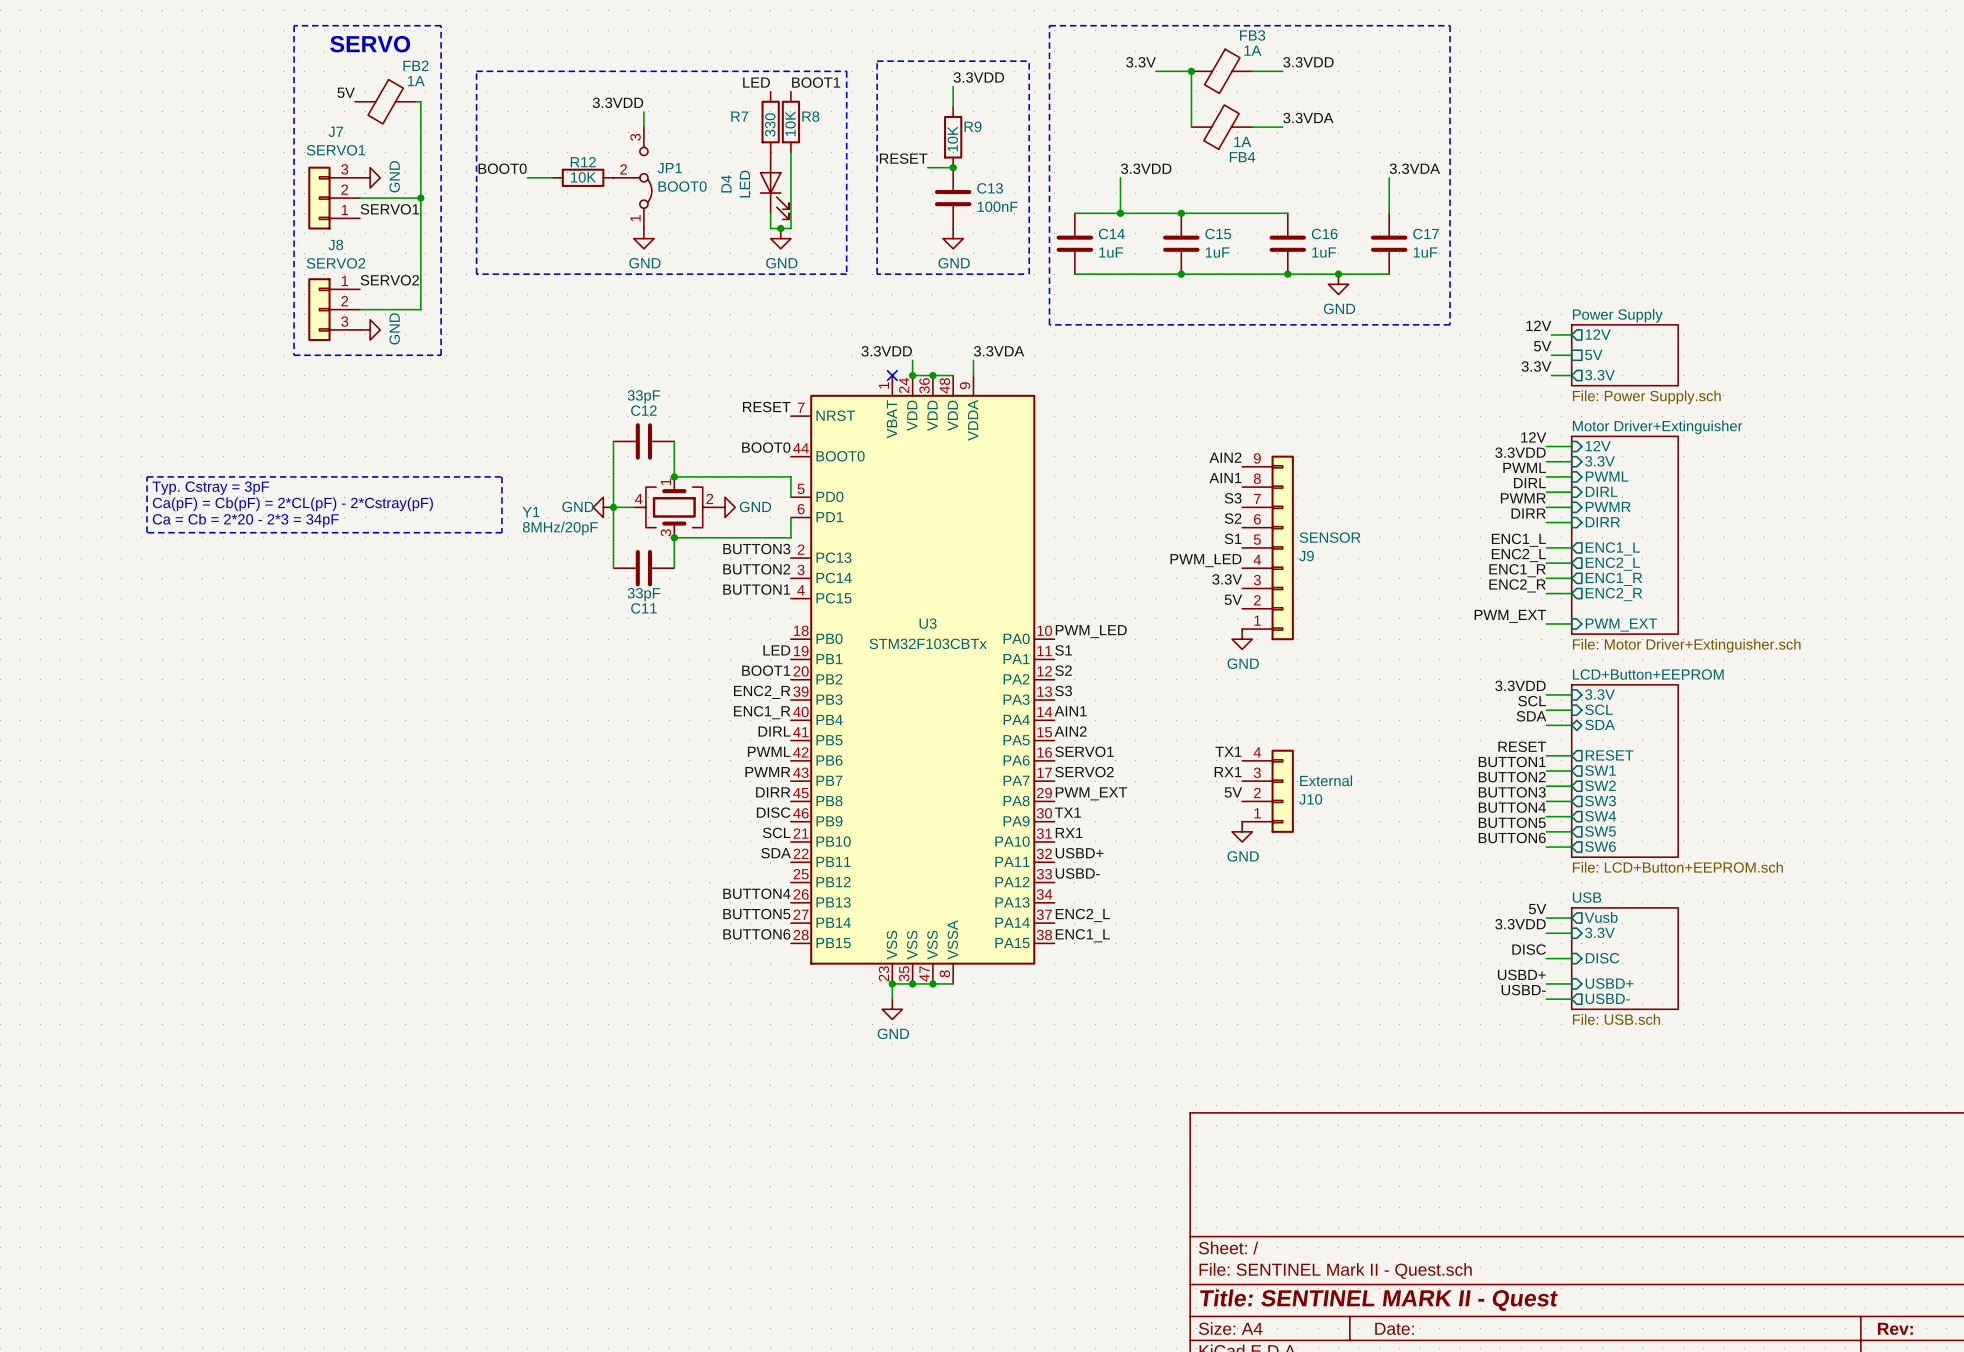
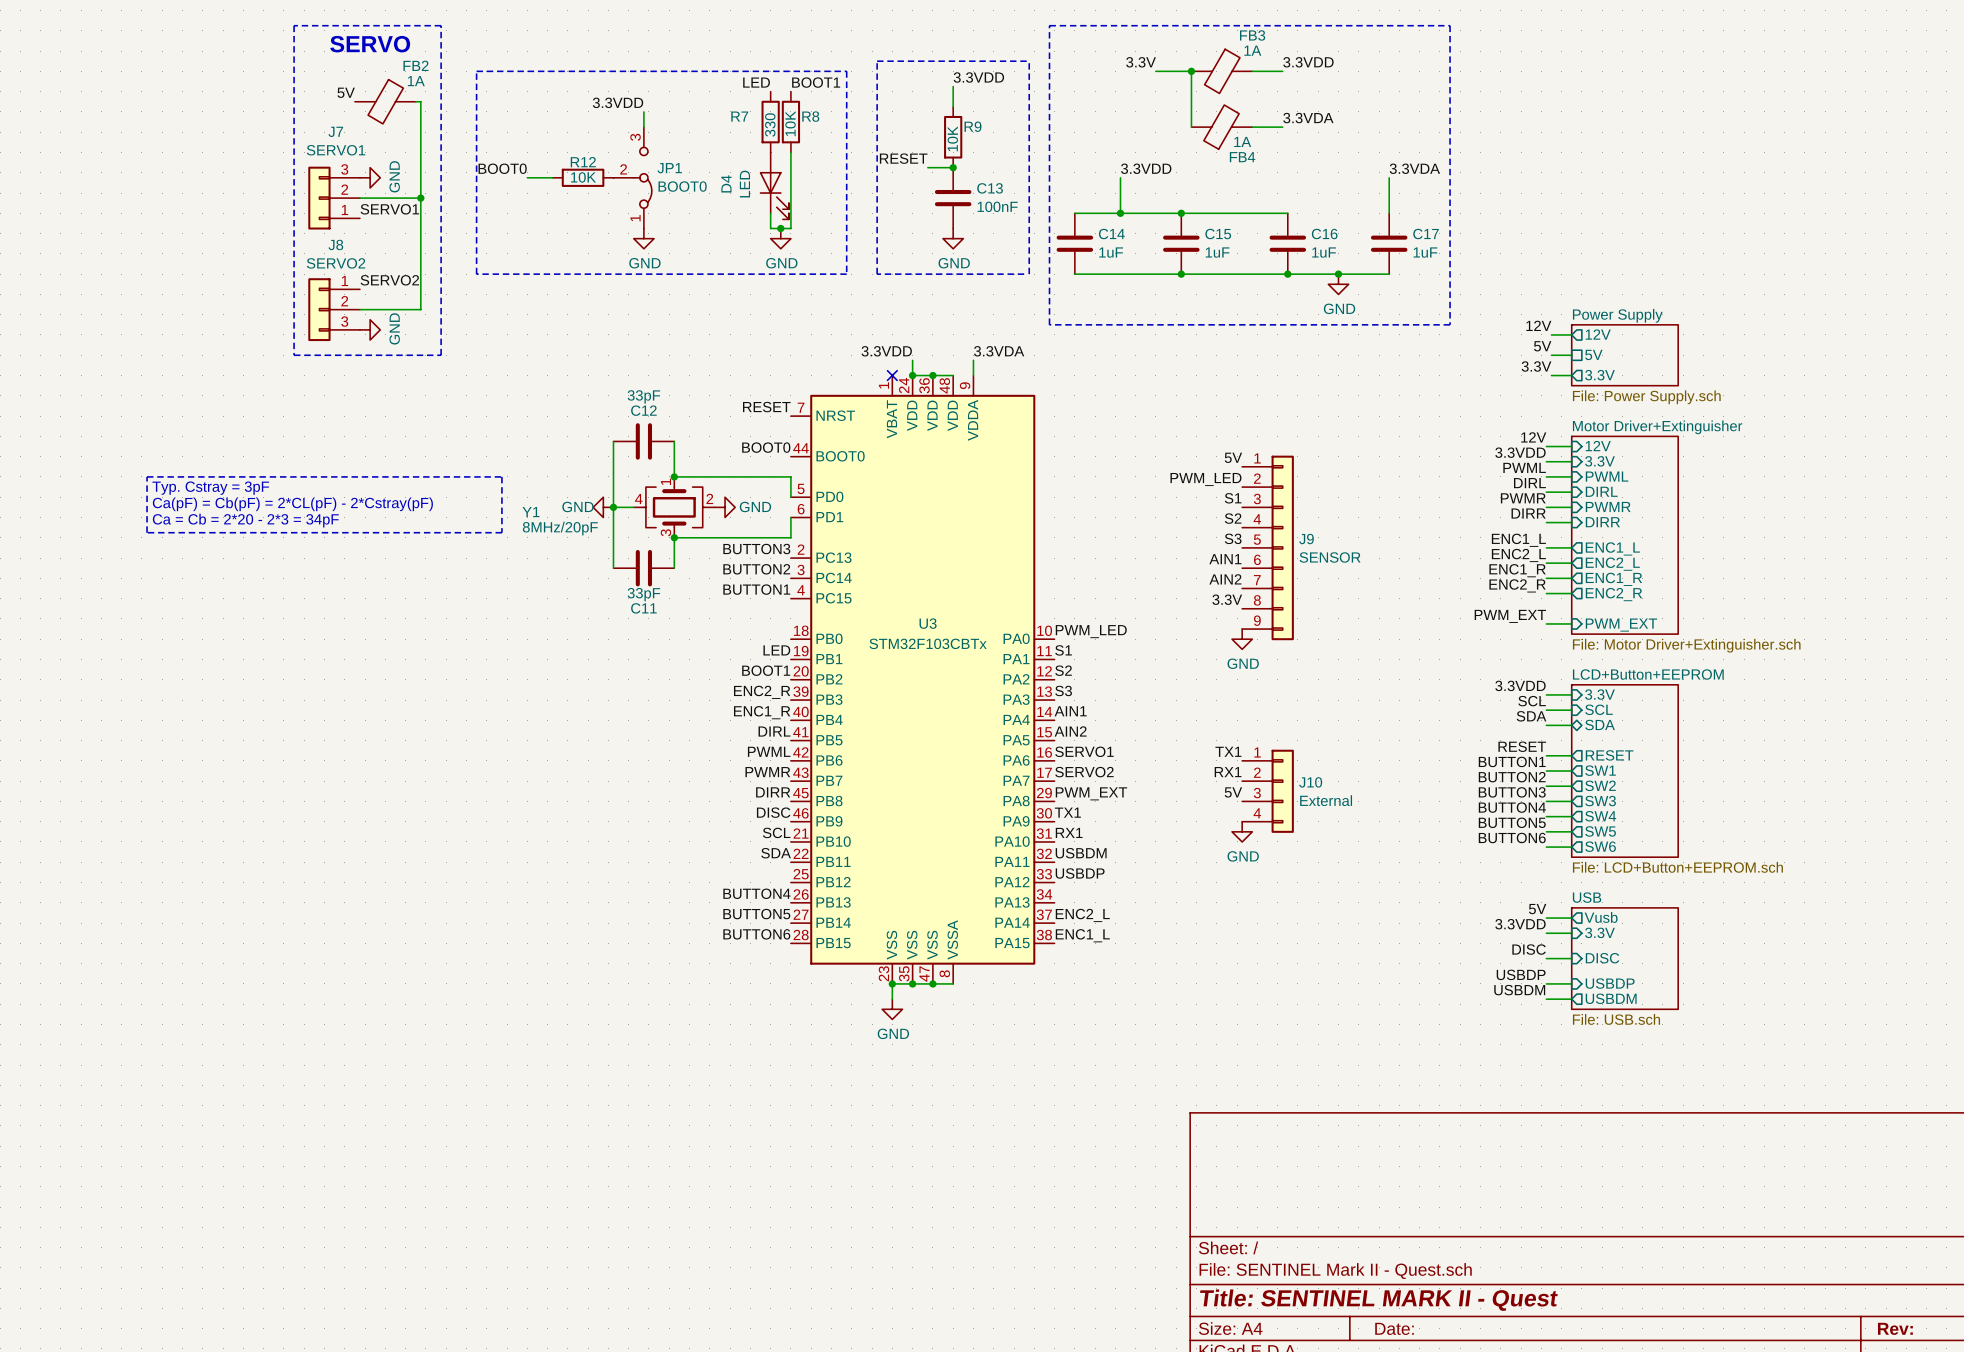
label: AIN2 (1225, 457) -> 5V (1233, 457)
label: AIN1 (1225, 478) -> PWM_LED (1205, 479)
label: S3 (1233, 498) -> S1 (1233, 498)
label: S1 (1233, 538) -> S3 (1233, 538)
J9 flip: as is (1282, 547) -> up-down (1282, 547)
label: PWM_LED (1205, 560) -> AIN1 (1225, 559)
label: 3.3V (1227, 579) -> AIN2 (1225, 579)
label: 5V (1233, 599) -> 3.3V (1227, 599)
J10 flip: as is (1282, 791) -> up-down (1282, 791)
label: USBD+ (1079, 853) -> USBDM (1081, 853)
label: USBD- (1077, 873) -> USBDP (1080, 873)
label: USBD+ (1521, 974) -> USBDP (1521, 974)
sheet pin: USBD+ (1609, 983) -> USBDP (1610, 983)
label: USBD- (1523, 990) -> USBDM (1519, 990)
sheet pin: USBD- (1607, 998) -> USBDM (1611, 998)

